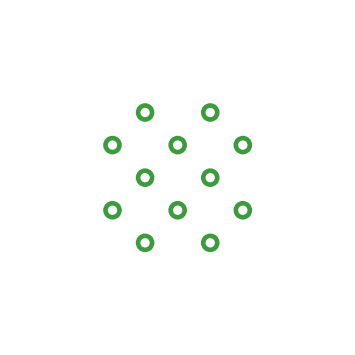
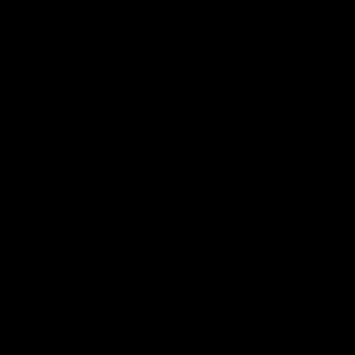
part: (177, 177) -> none

